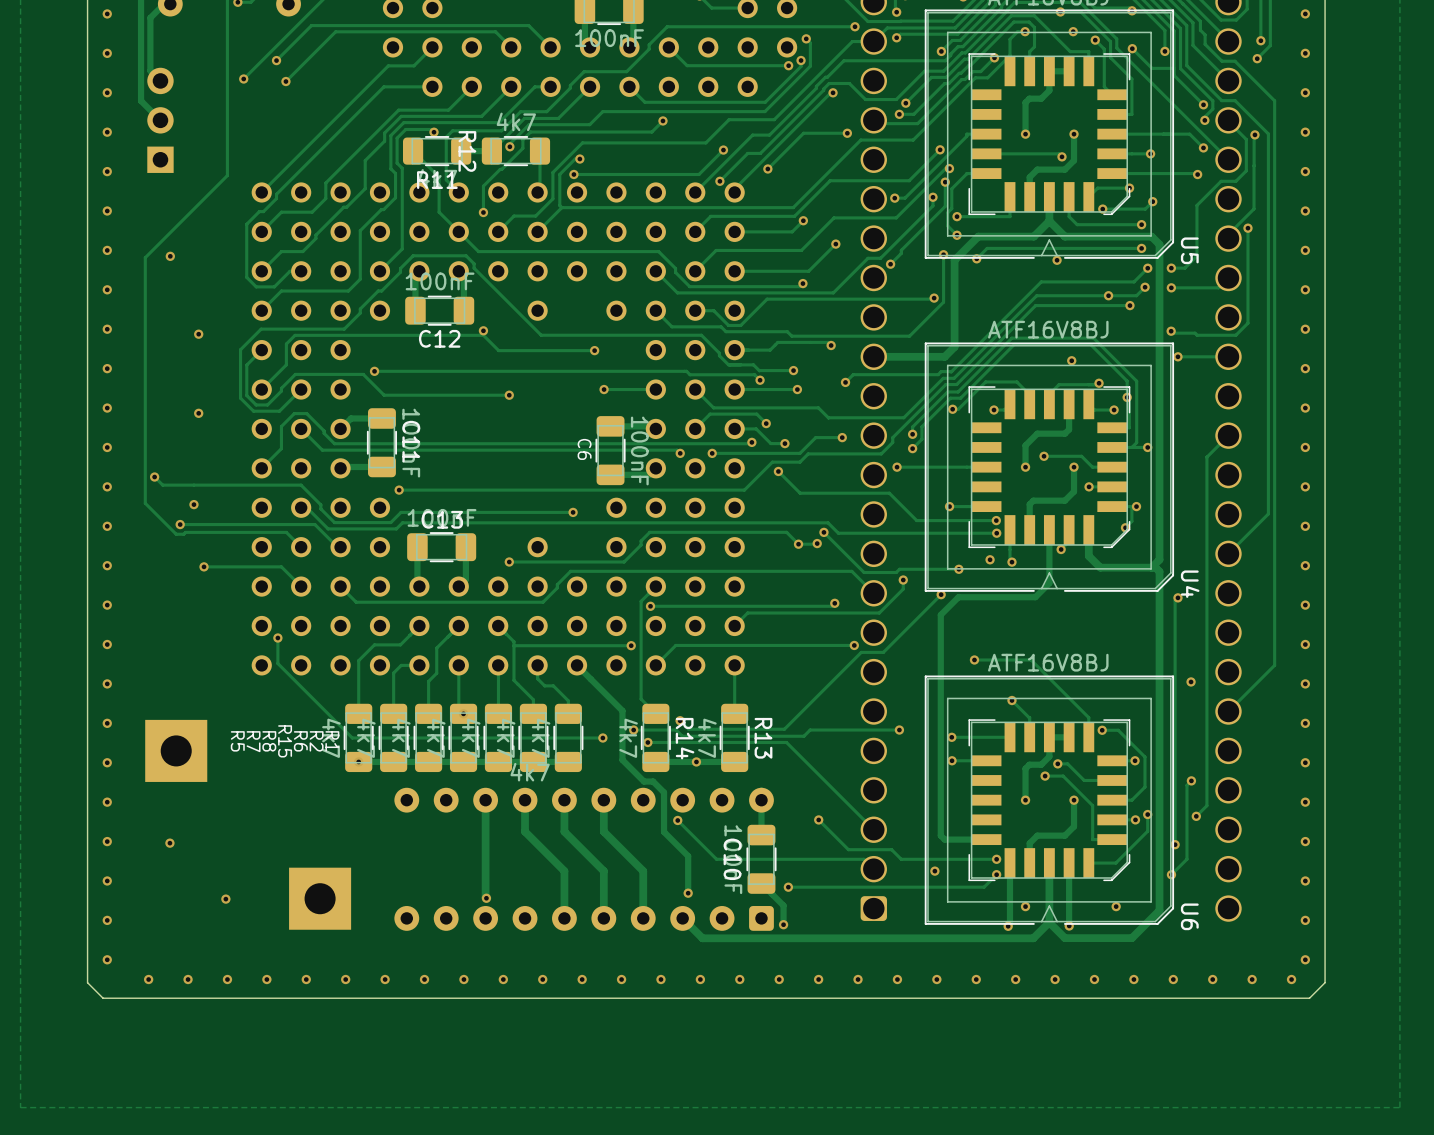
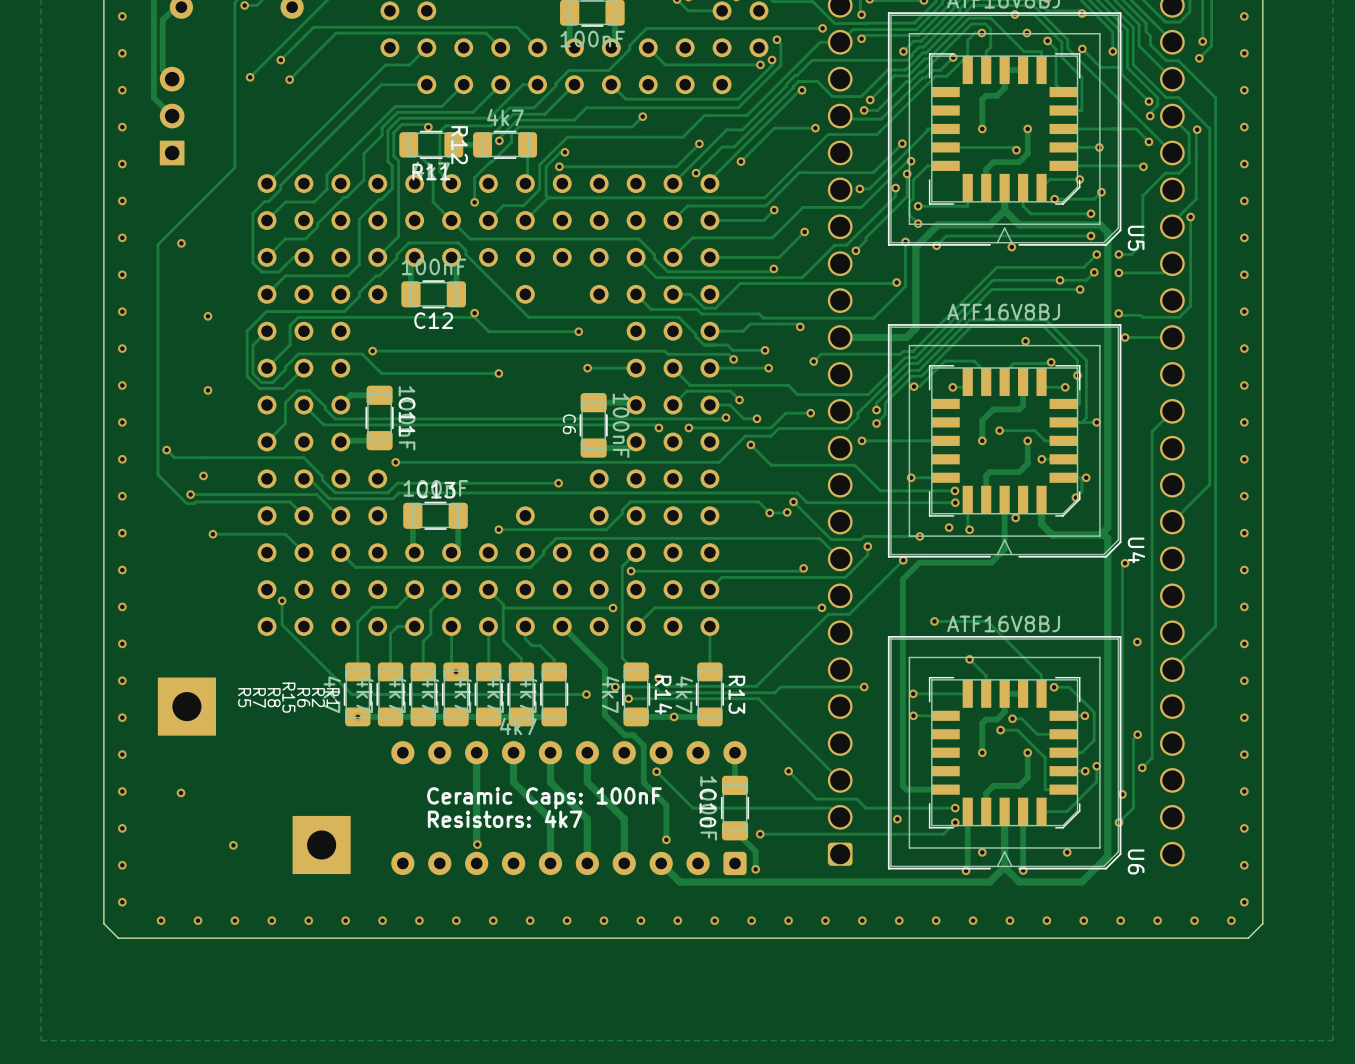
text: none -> Ceramic Caps: 100nF (544, 798)
text: none -> Resistors: 4k7 (505, 818)

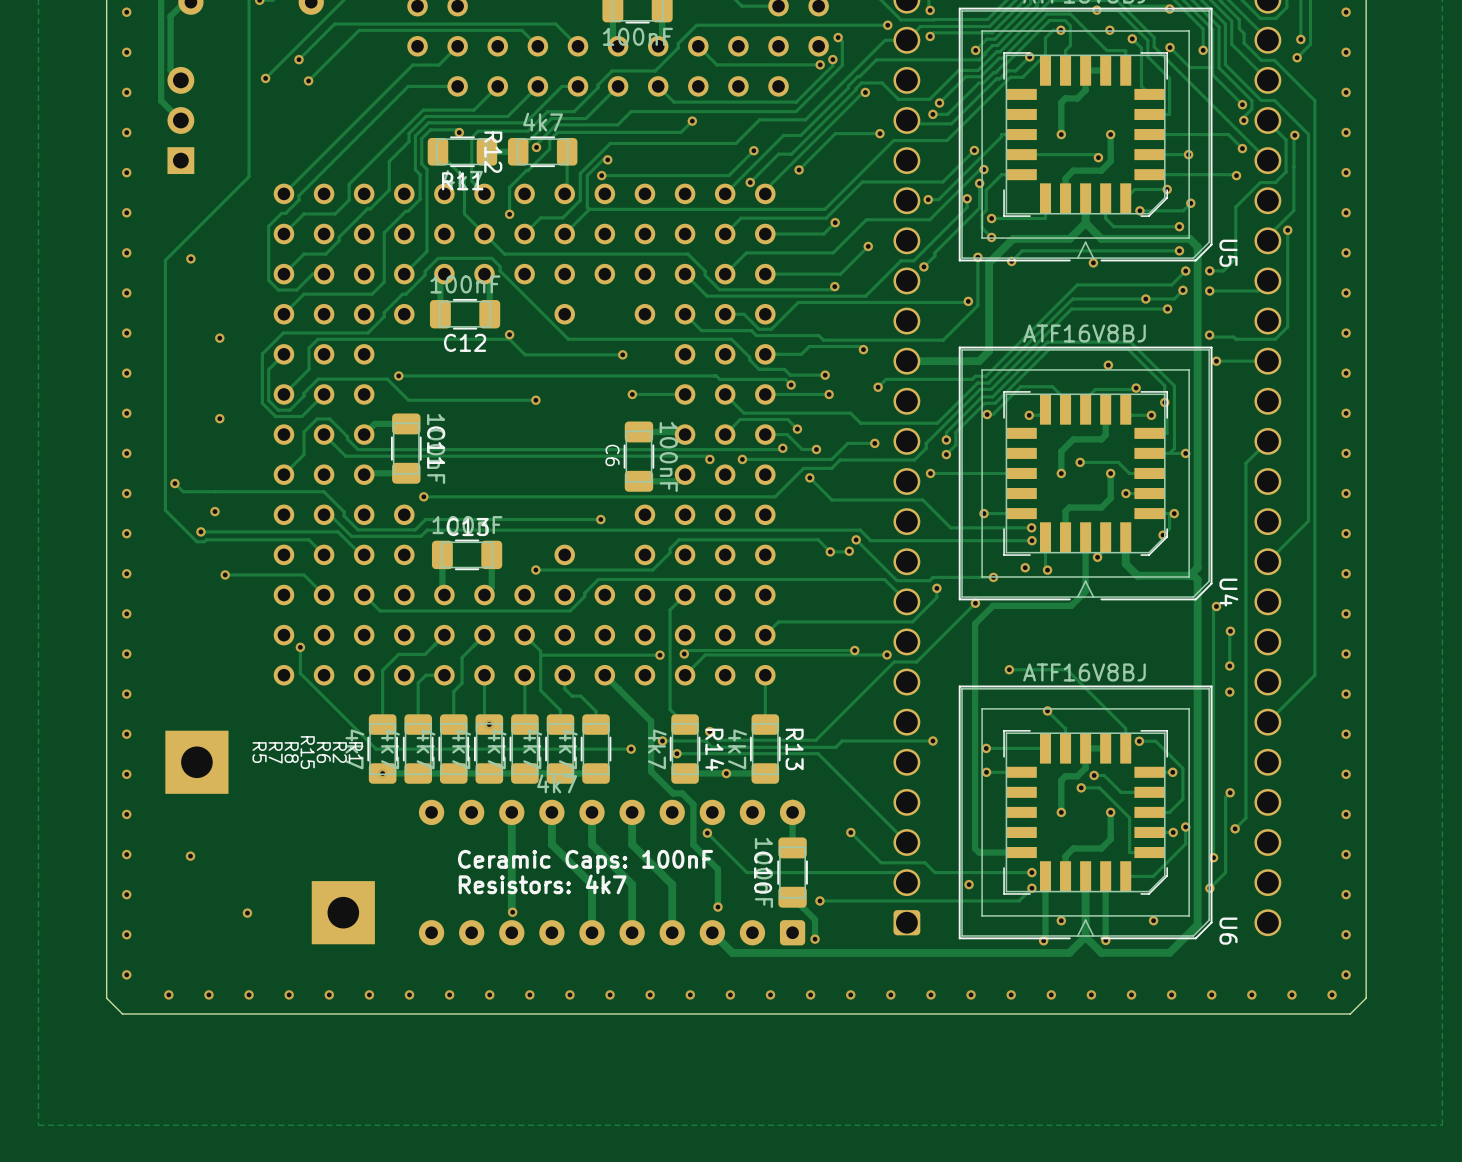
track: (803, 568) (800, 571) (631, 571) -> none
via position: (803, 568) -> (854, 650)
via position: (631, 571) -> (684, 653)
track: none -> (1230, 631) (1229, 666)
via: none -> (1230, 631)
track: none -> (854, 650) (687, 650) (684, 653)
via: none -> (1229, 666)

